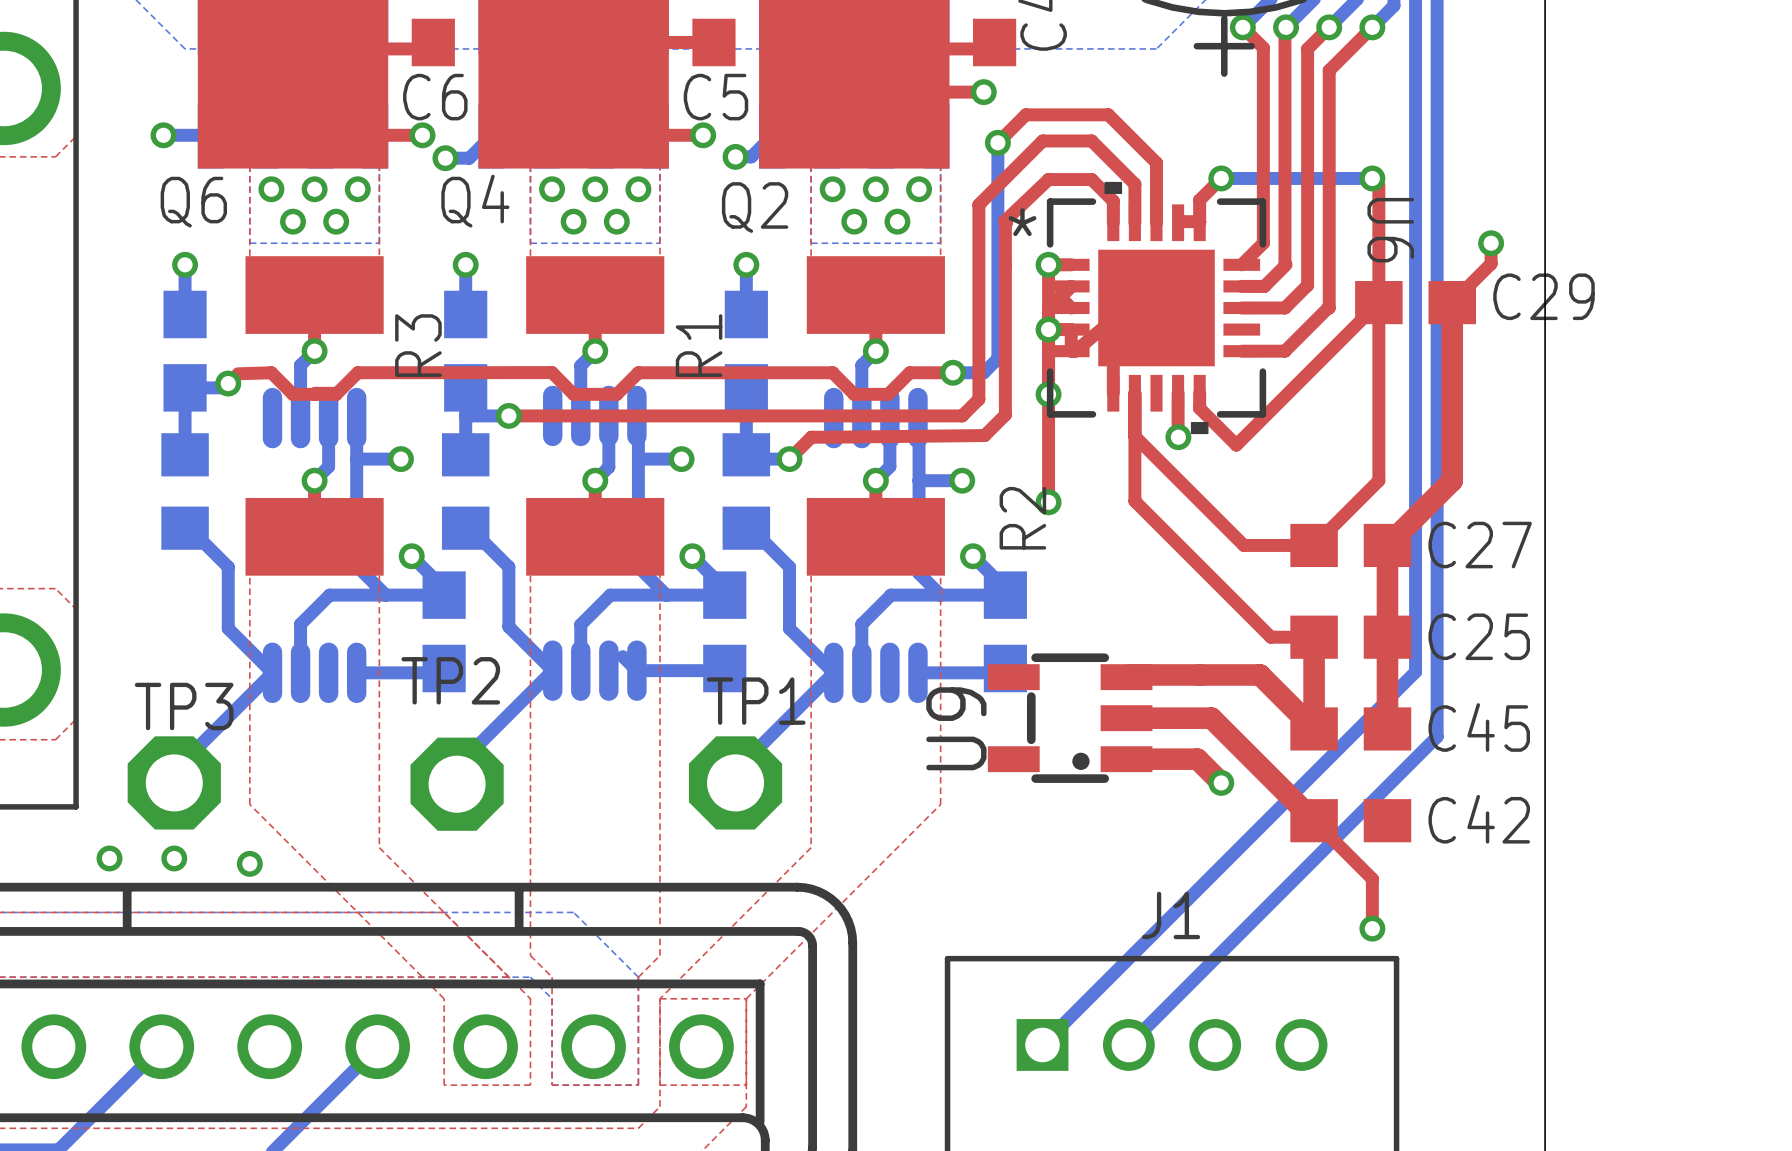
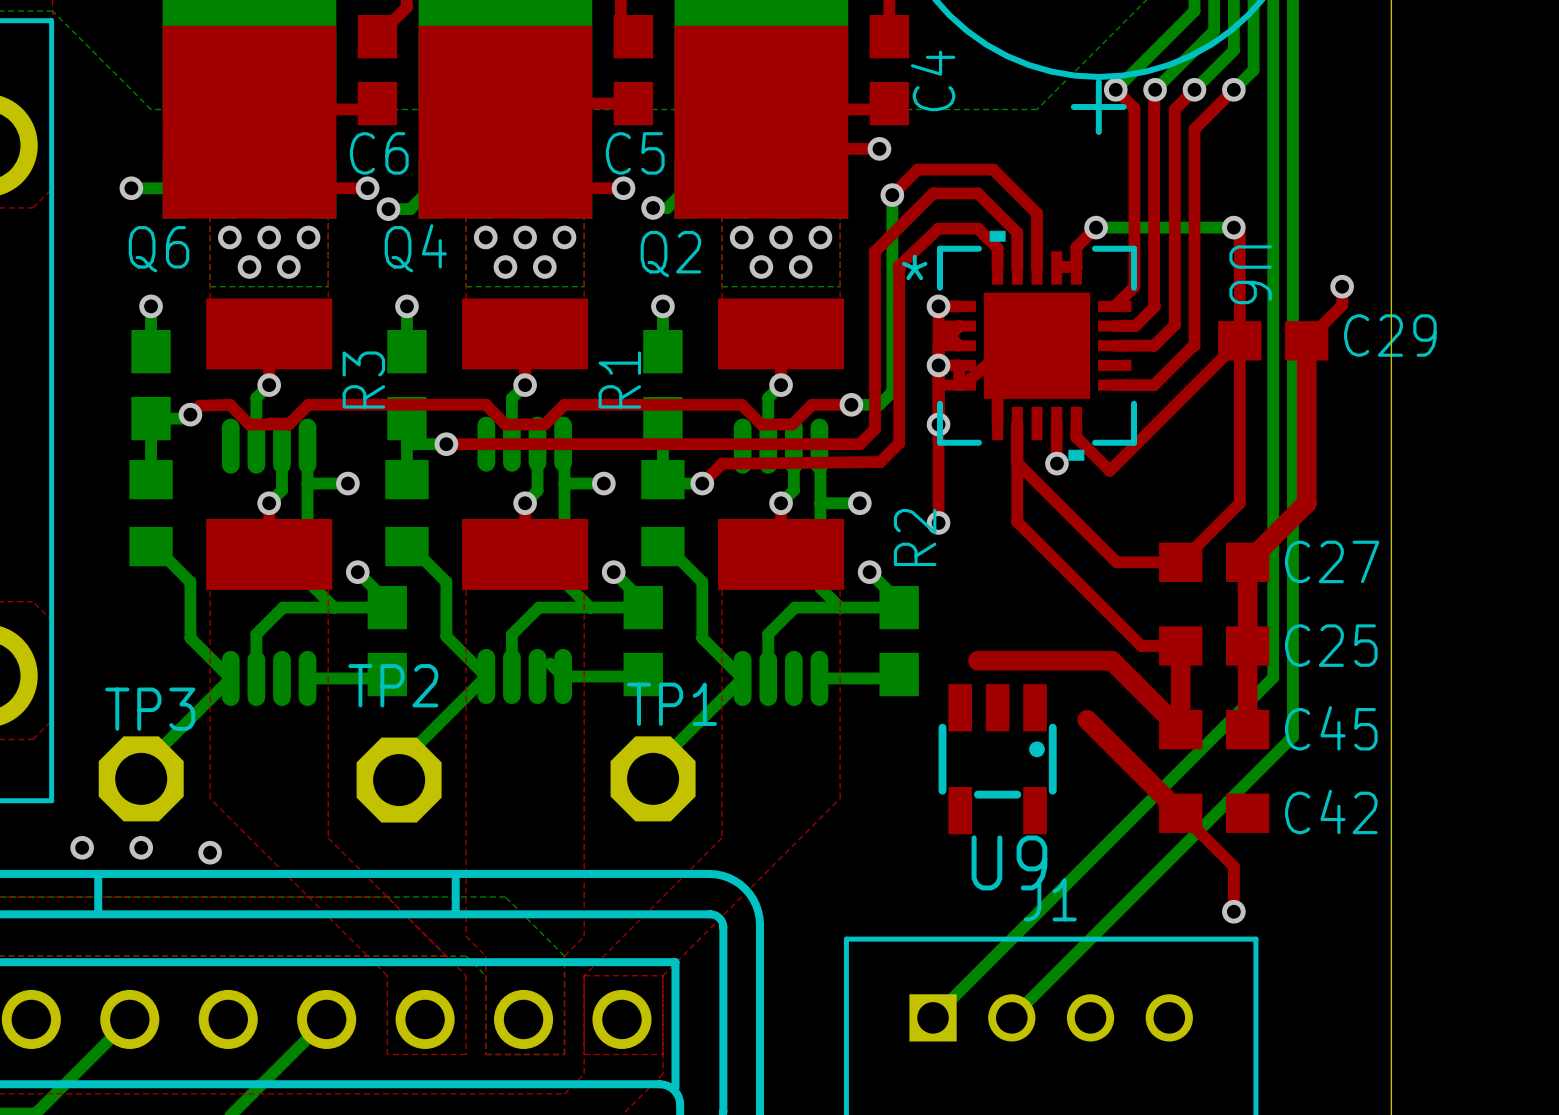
top track: (1260, 674) (1128, 674) (1126, 677) -> (1131, 680) (1111, 660) (977, 660)
U9 rotation: 0° (1070, 718) -> 90° counterclockwise (997, 759)
top track: (1126, 718) (1211, 718) -> none
top track: (1126, 759) (1197, 759) (1221, 782) -> none
via: (1221, 782) -> none

